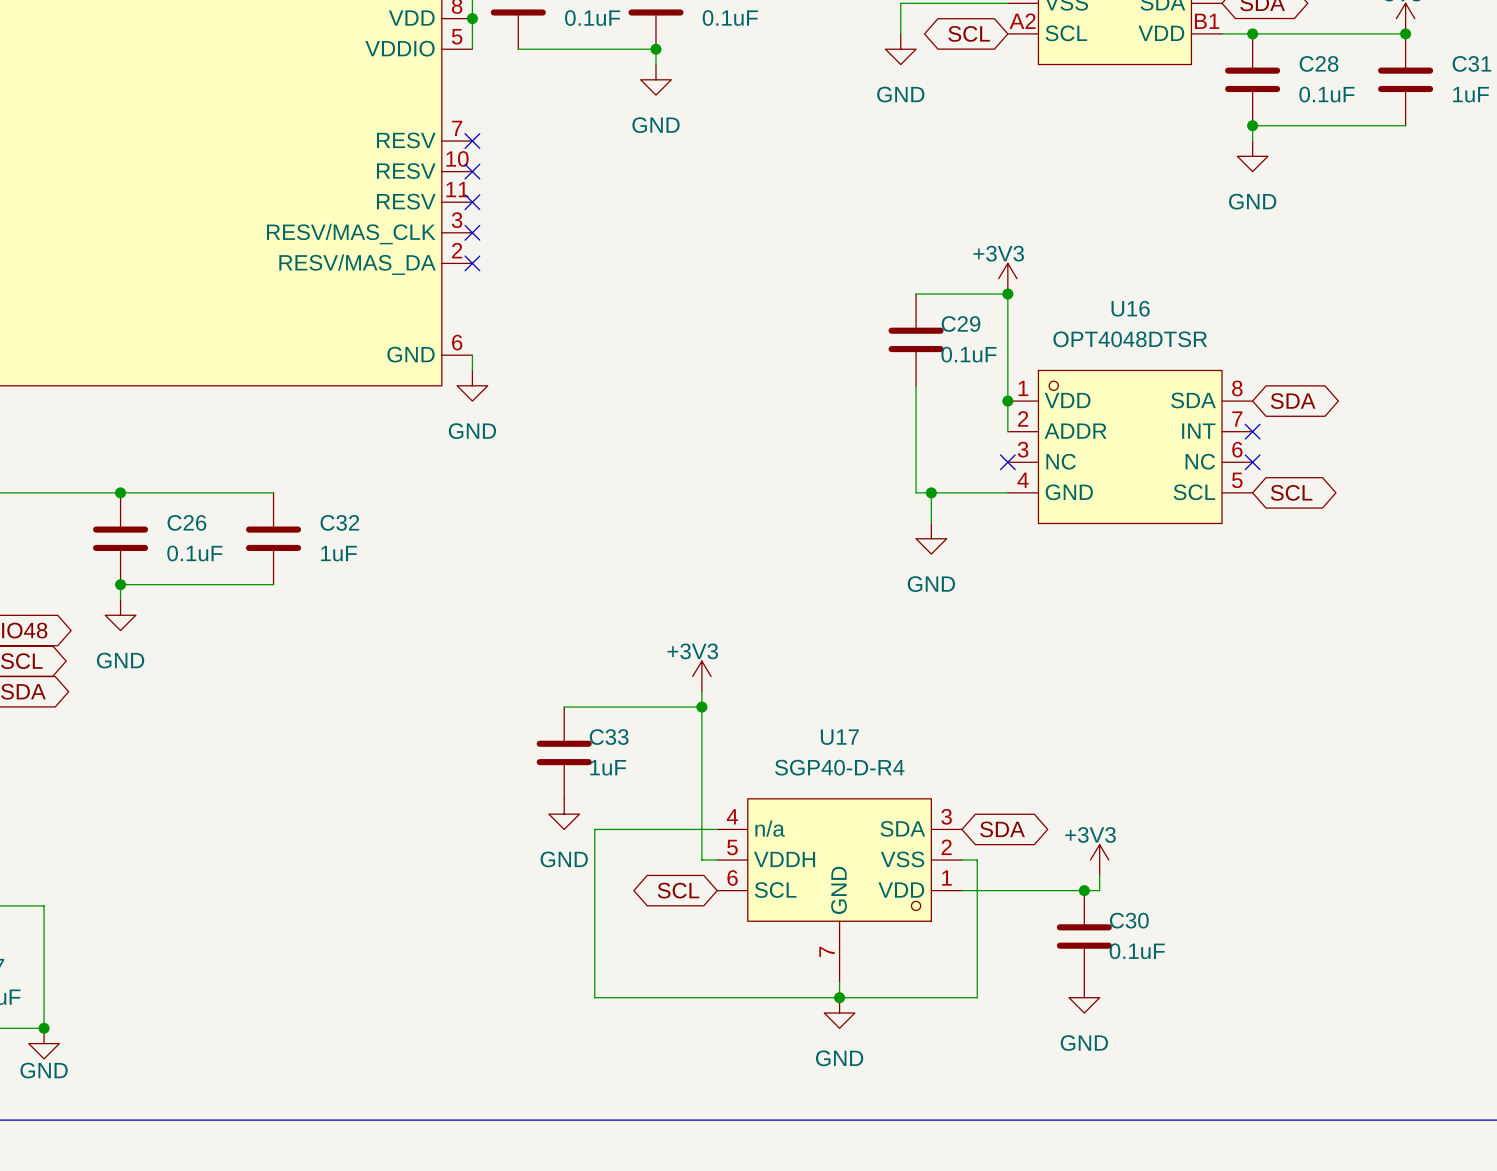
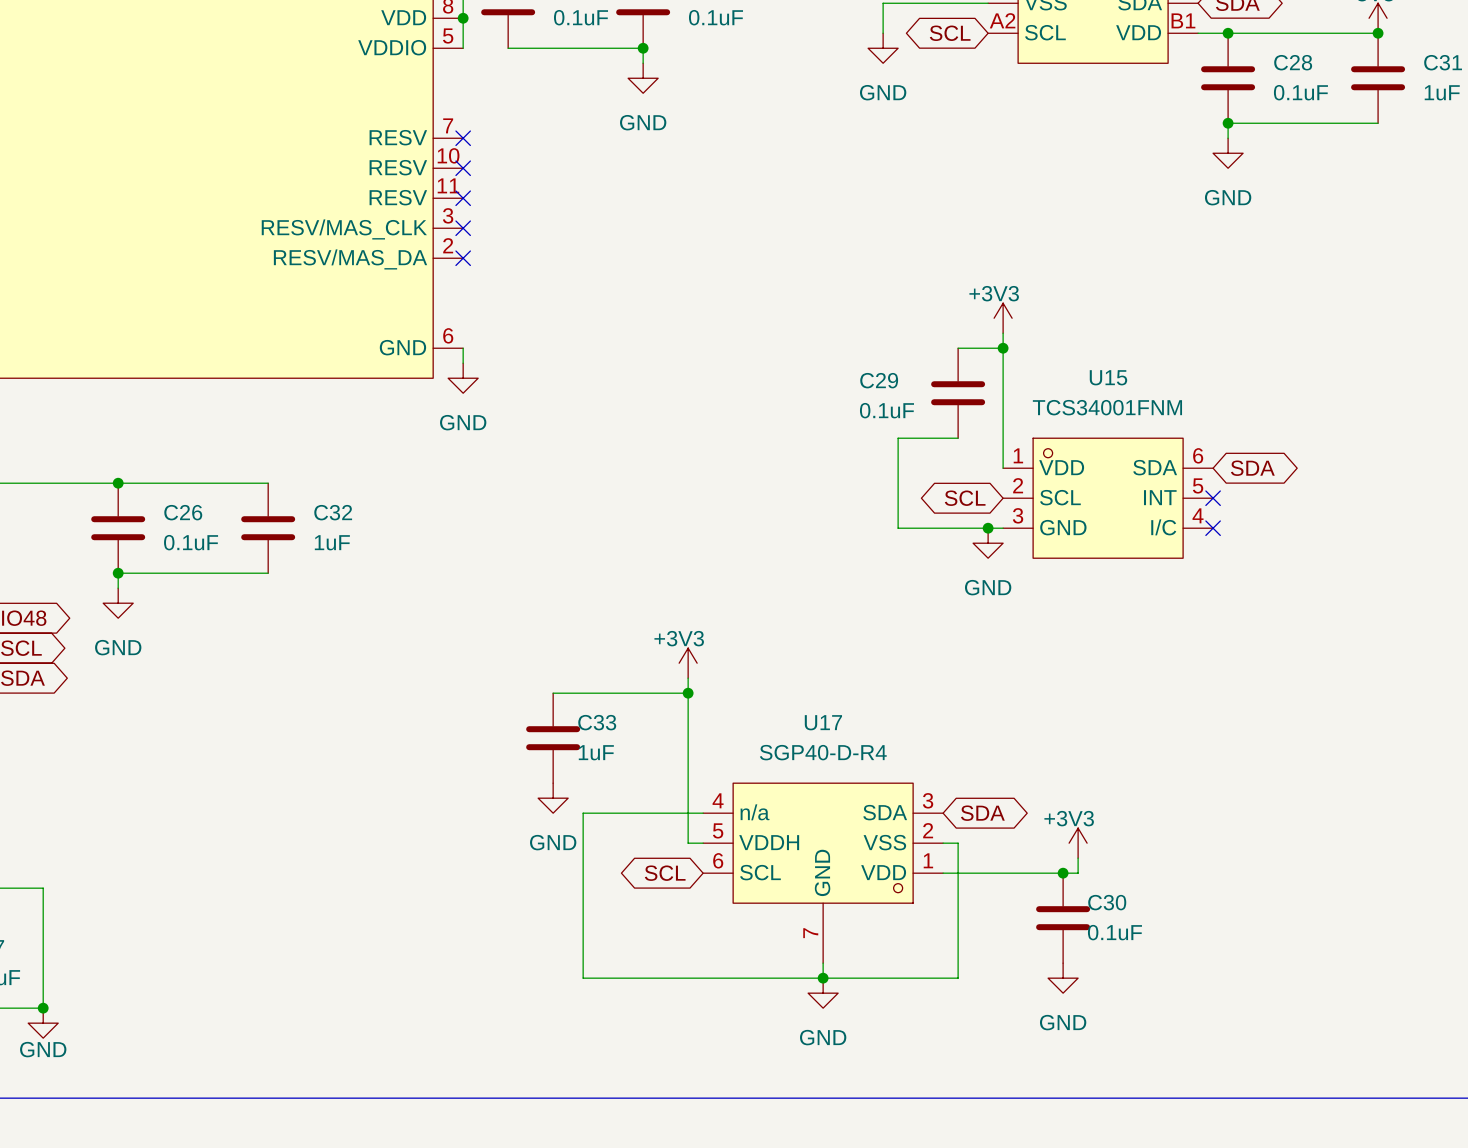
power symbol position: +3V3 (1007, 278) -> +3V3 (1003, 318)
wire: (916, 293) (1007, 293) (1007, 431) -> none
junction: (1007, 293) -> none
C29 name position: C29 (960, 324) -> C29 (879, 380)
C29 position: (916, 339) -> (958, 393)
wire: none -> (1003, 333) (1003, 468)
C29 value position: 0.1uF (968, 354) -> 0.1uF (886, 410)
wire: none -> (958, 348) (1003, 348)
junction: none -> (1003, 348)
wire: (916, 385) (916, 446) -> (958, 438) (898, 438)
junction: (1007, 401) -> none
global label position: SDA (1293, 401) -> SDA (1252, 468)
no-connect mark: (1252, 431) -> none
U16: OPT4048DTSR (1130, 446) -> none
no-connect mark: (1007, 462) -> none
no-connect mark: (1252, 462) -> none
wire: (916, 492) (1007, 492) -> (898, 483) (898, 528) (1003, 528)
wire: (931, 492) (931, 523) -> none
junction: (931, 492) -> none
global label rotation: 0° (1291, 492) -> 180° (965, 498)
global label position: SCL (1291, 492) -> SCL (965, 498)
U15: none -> TCS34001FNM (1108, 498)
no-connect mark: none -> (1213, 498)
power symbol position: GND (931, 538) -> GND (988, 543)
junction: none -> (988, 528)
no-connect mark: none -> (1213, 528)

